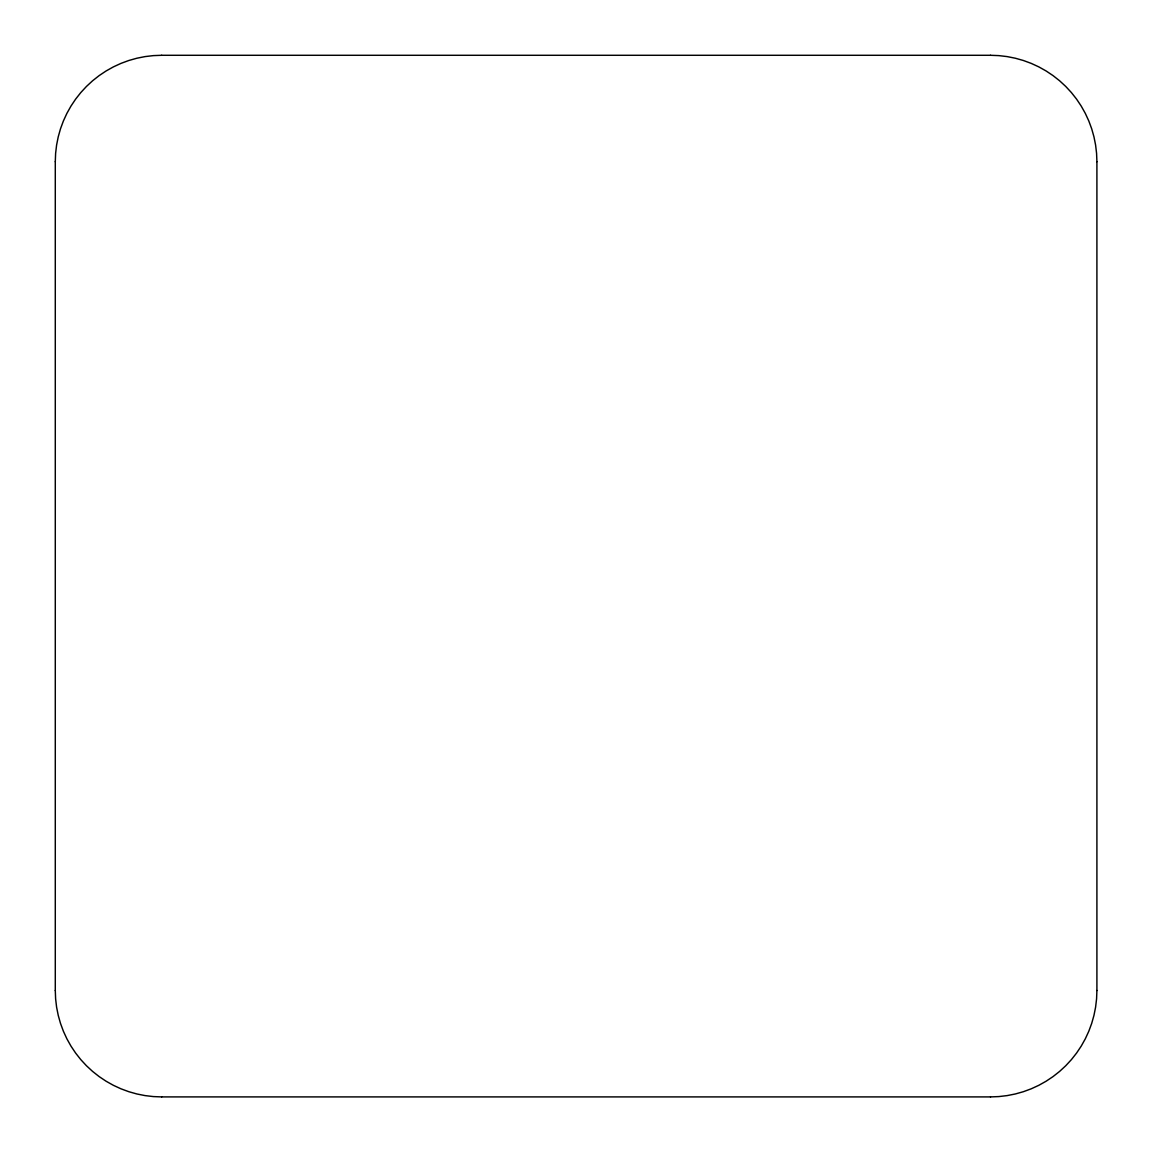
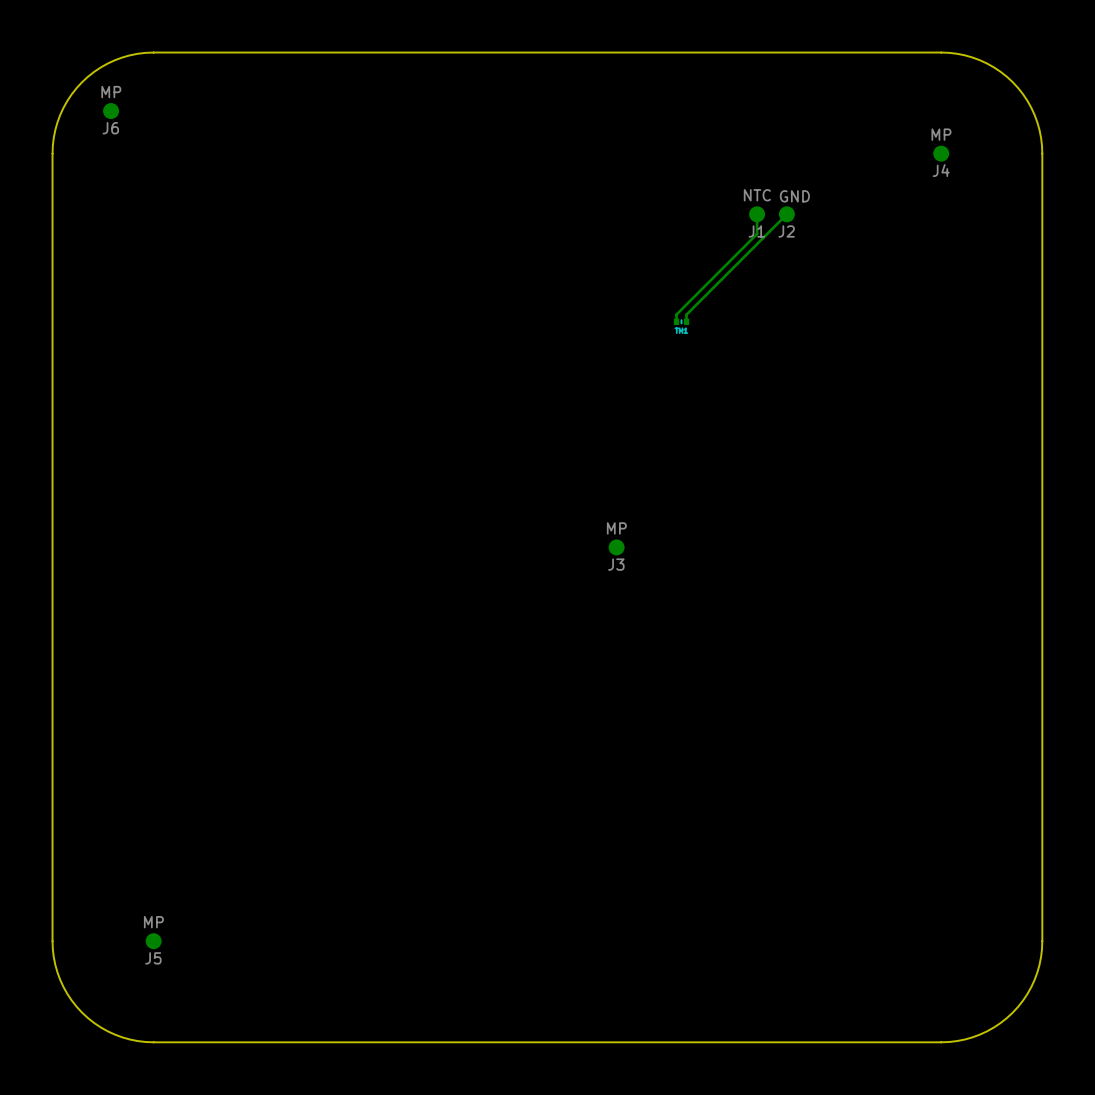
J6: none -> MP (111, 111)
J4: none -> MP (941, 153)
bottom track: none -> (757, 214) (757, 233) (676, 314) (676, 321)
J1: none -> NTC (757, 214)
bottom track: none -> (786, 214) (686, 314) (686, 321)
J2: none -> GND (786, 214)
part: none -> (681, 321)
J3: none -> MP (616, 547)
J5: none -> MP (153, 941)

